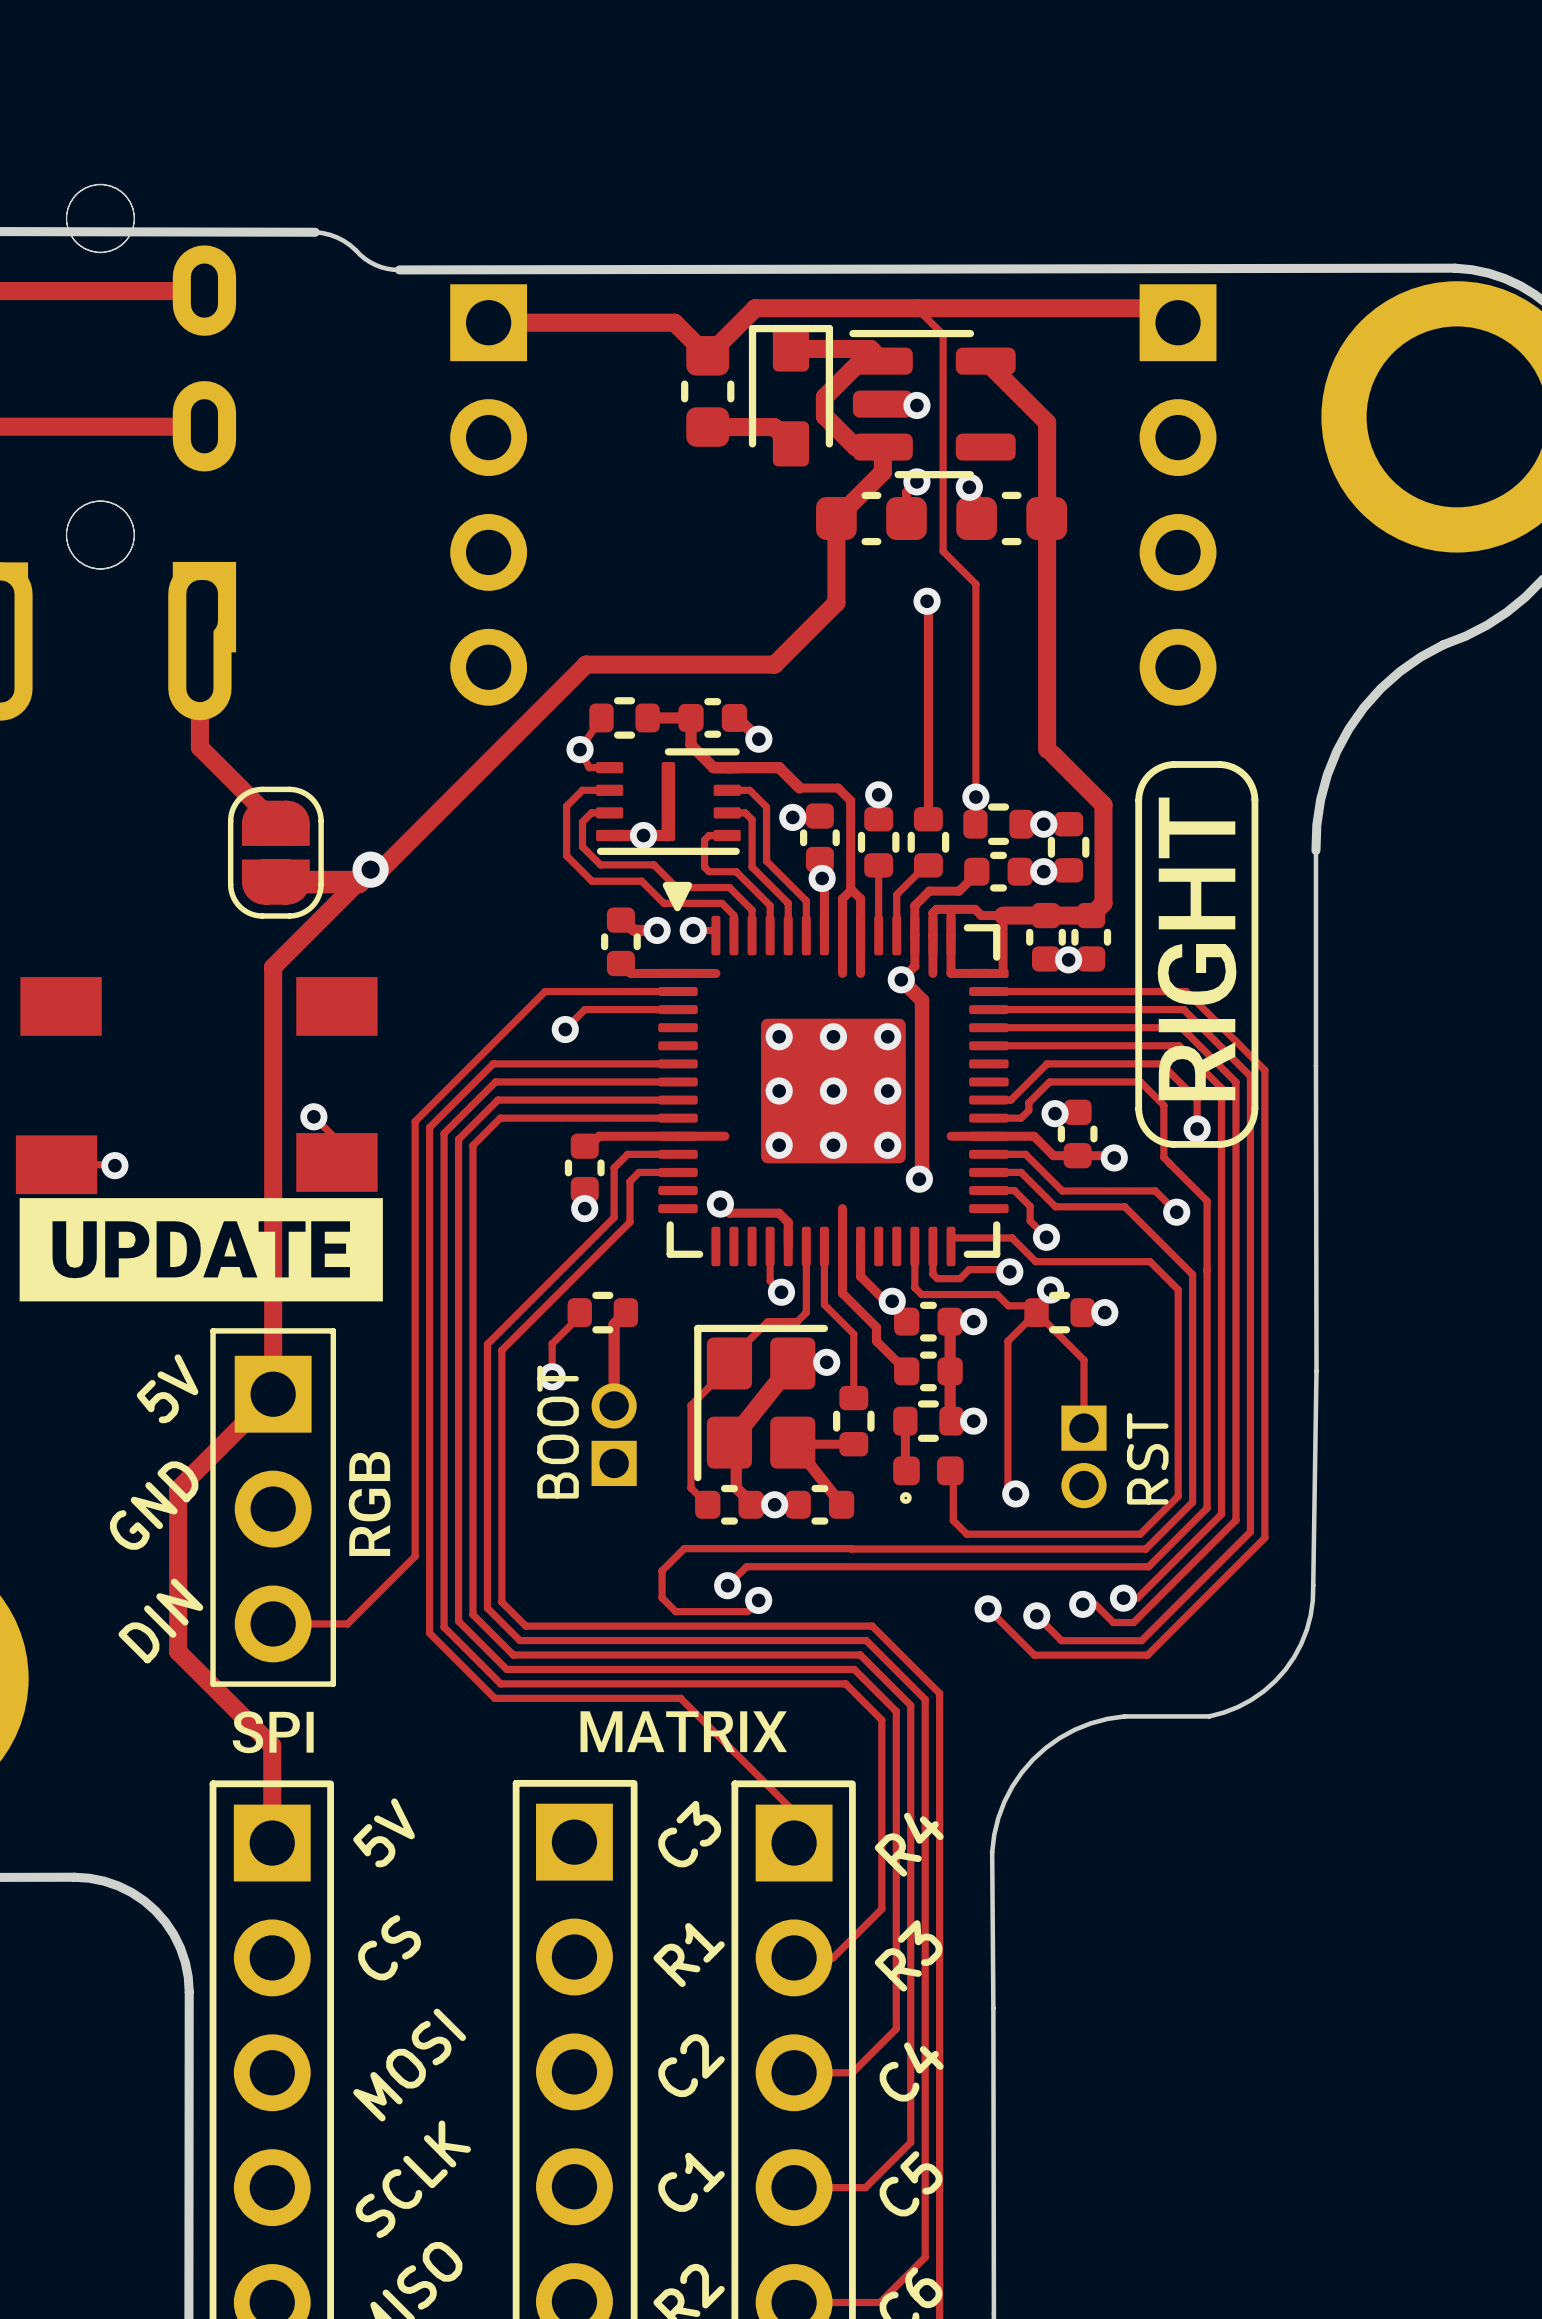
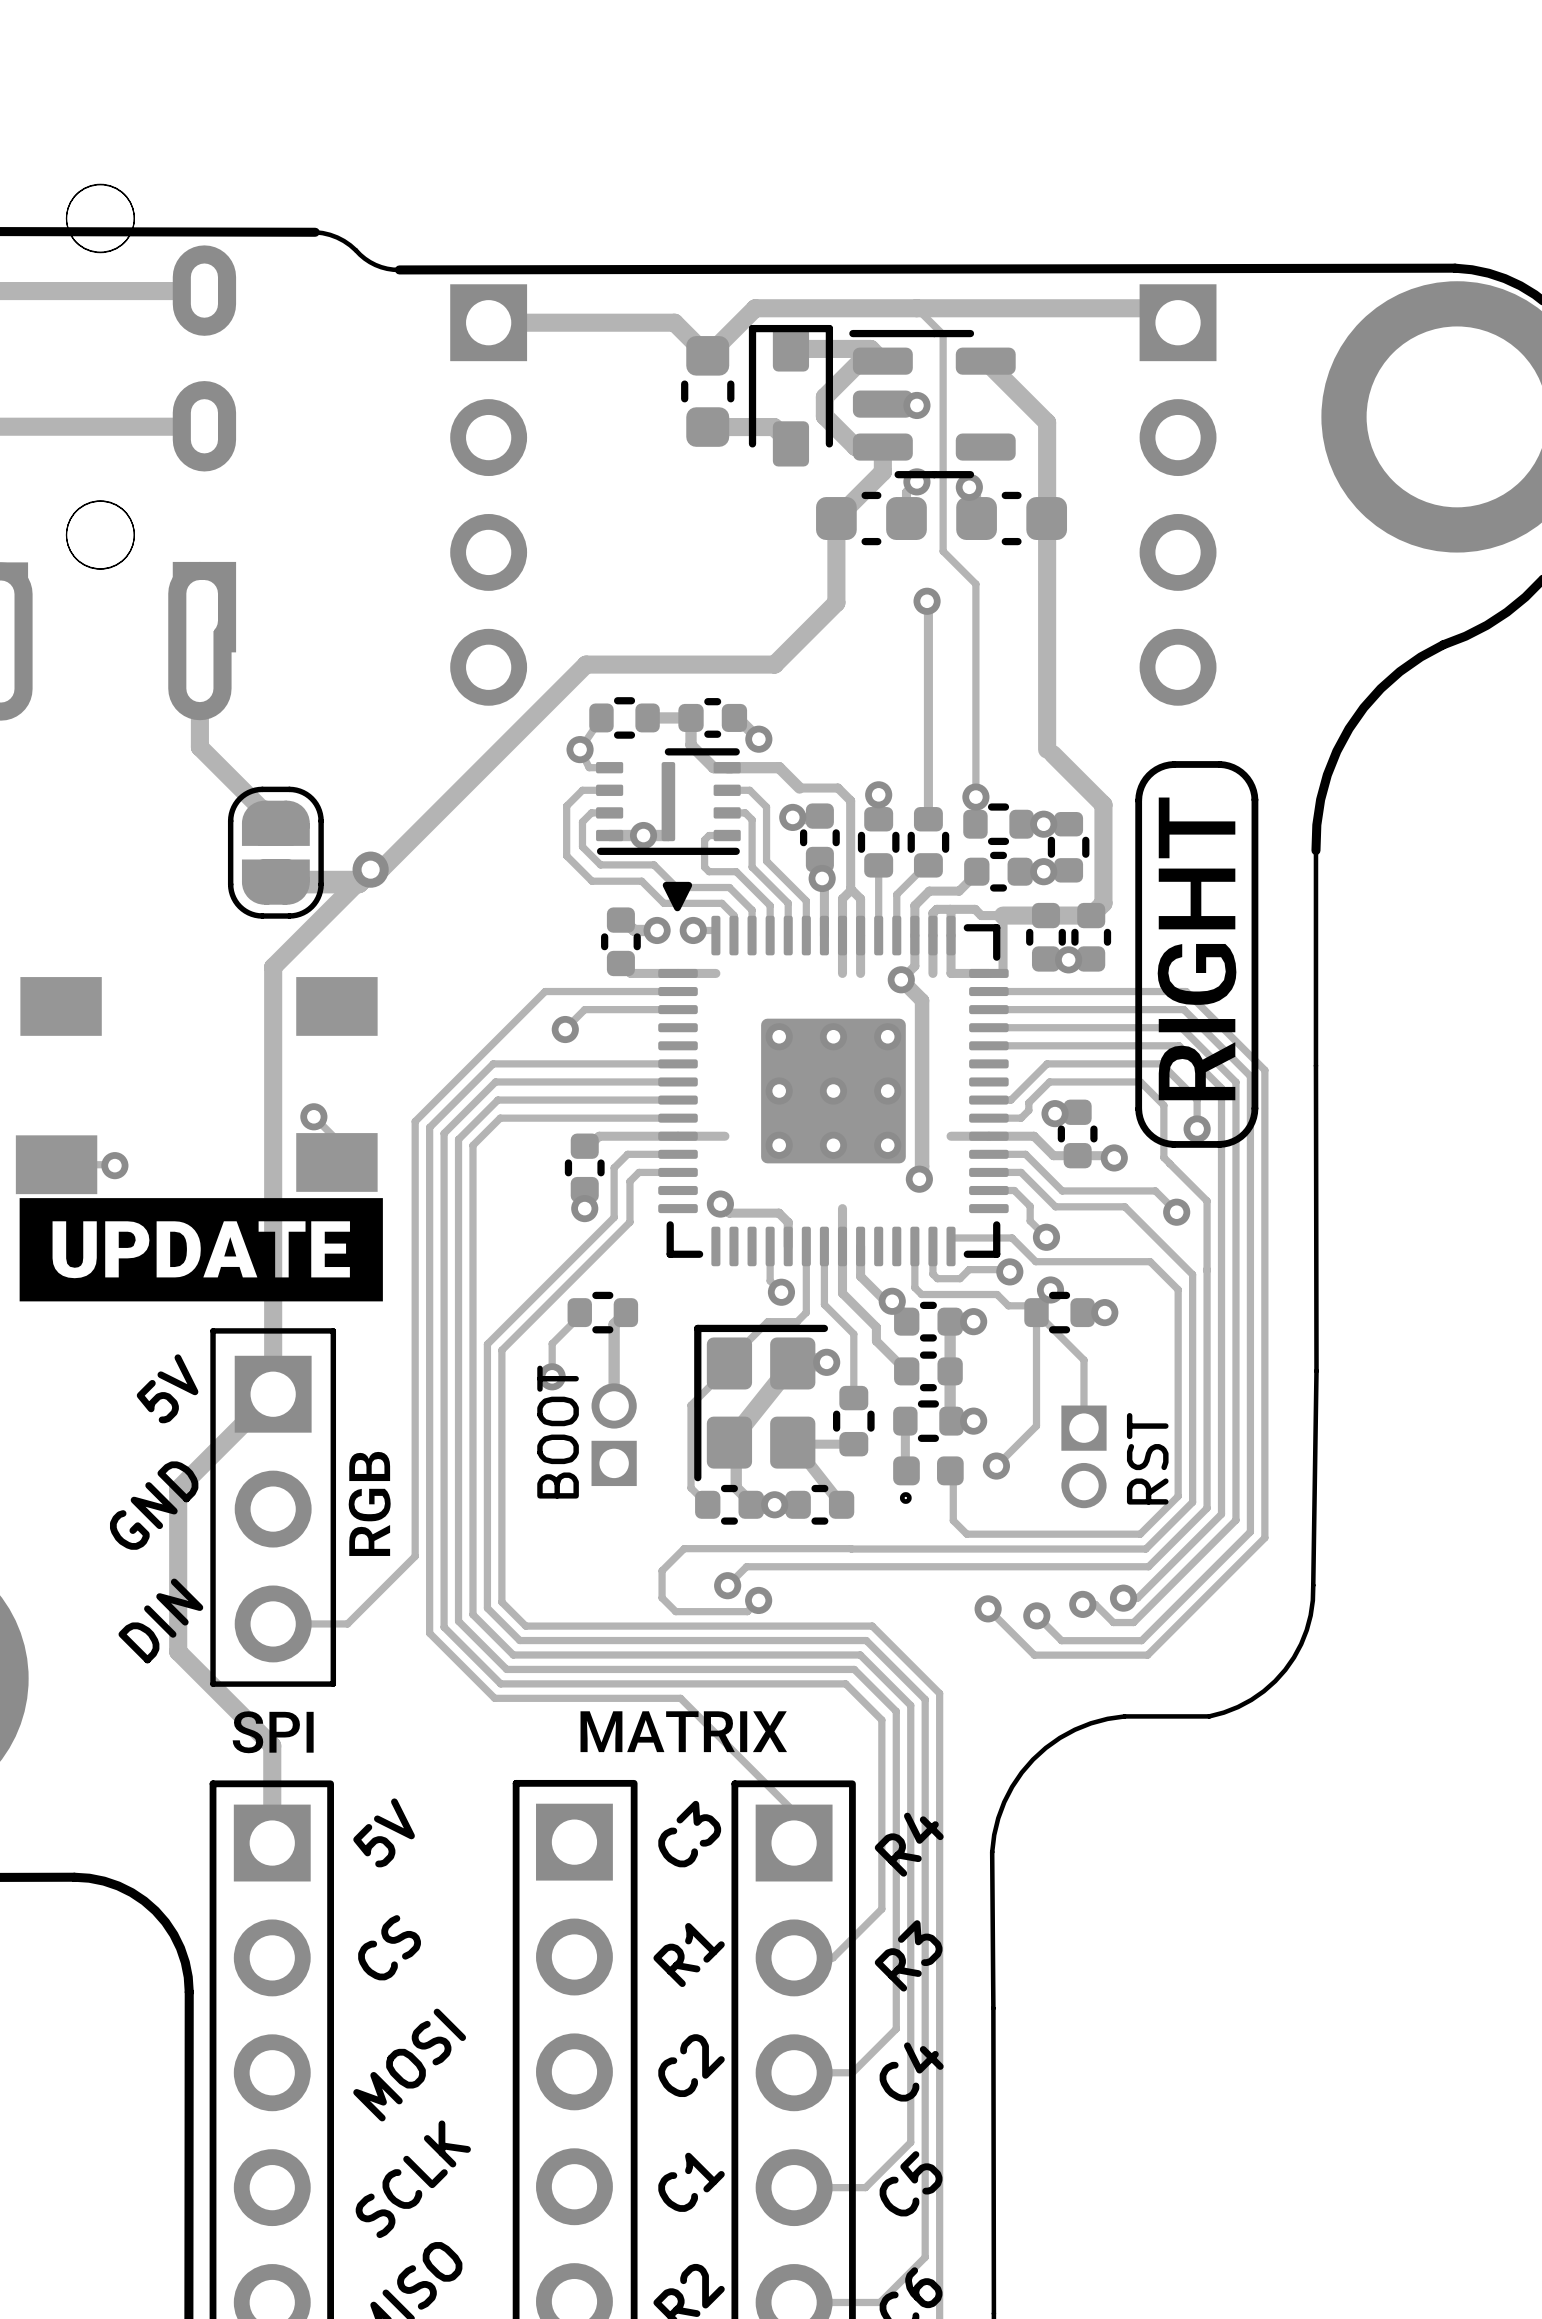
track: (1036, 1312) (1007, 1341) (1007, 1486) (1015, 1493) -> (1036, 1312) (1036, 1425) (996, 1466)
via position: (1015, 1493) -> (996, 1466)

